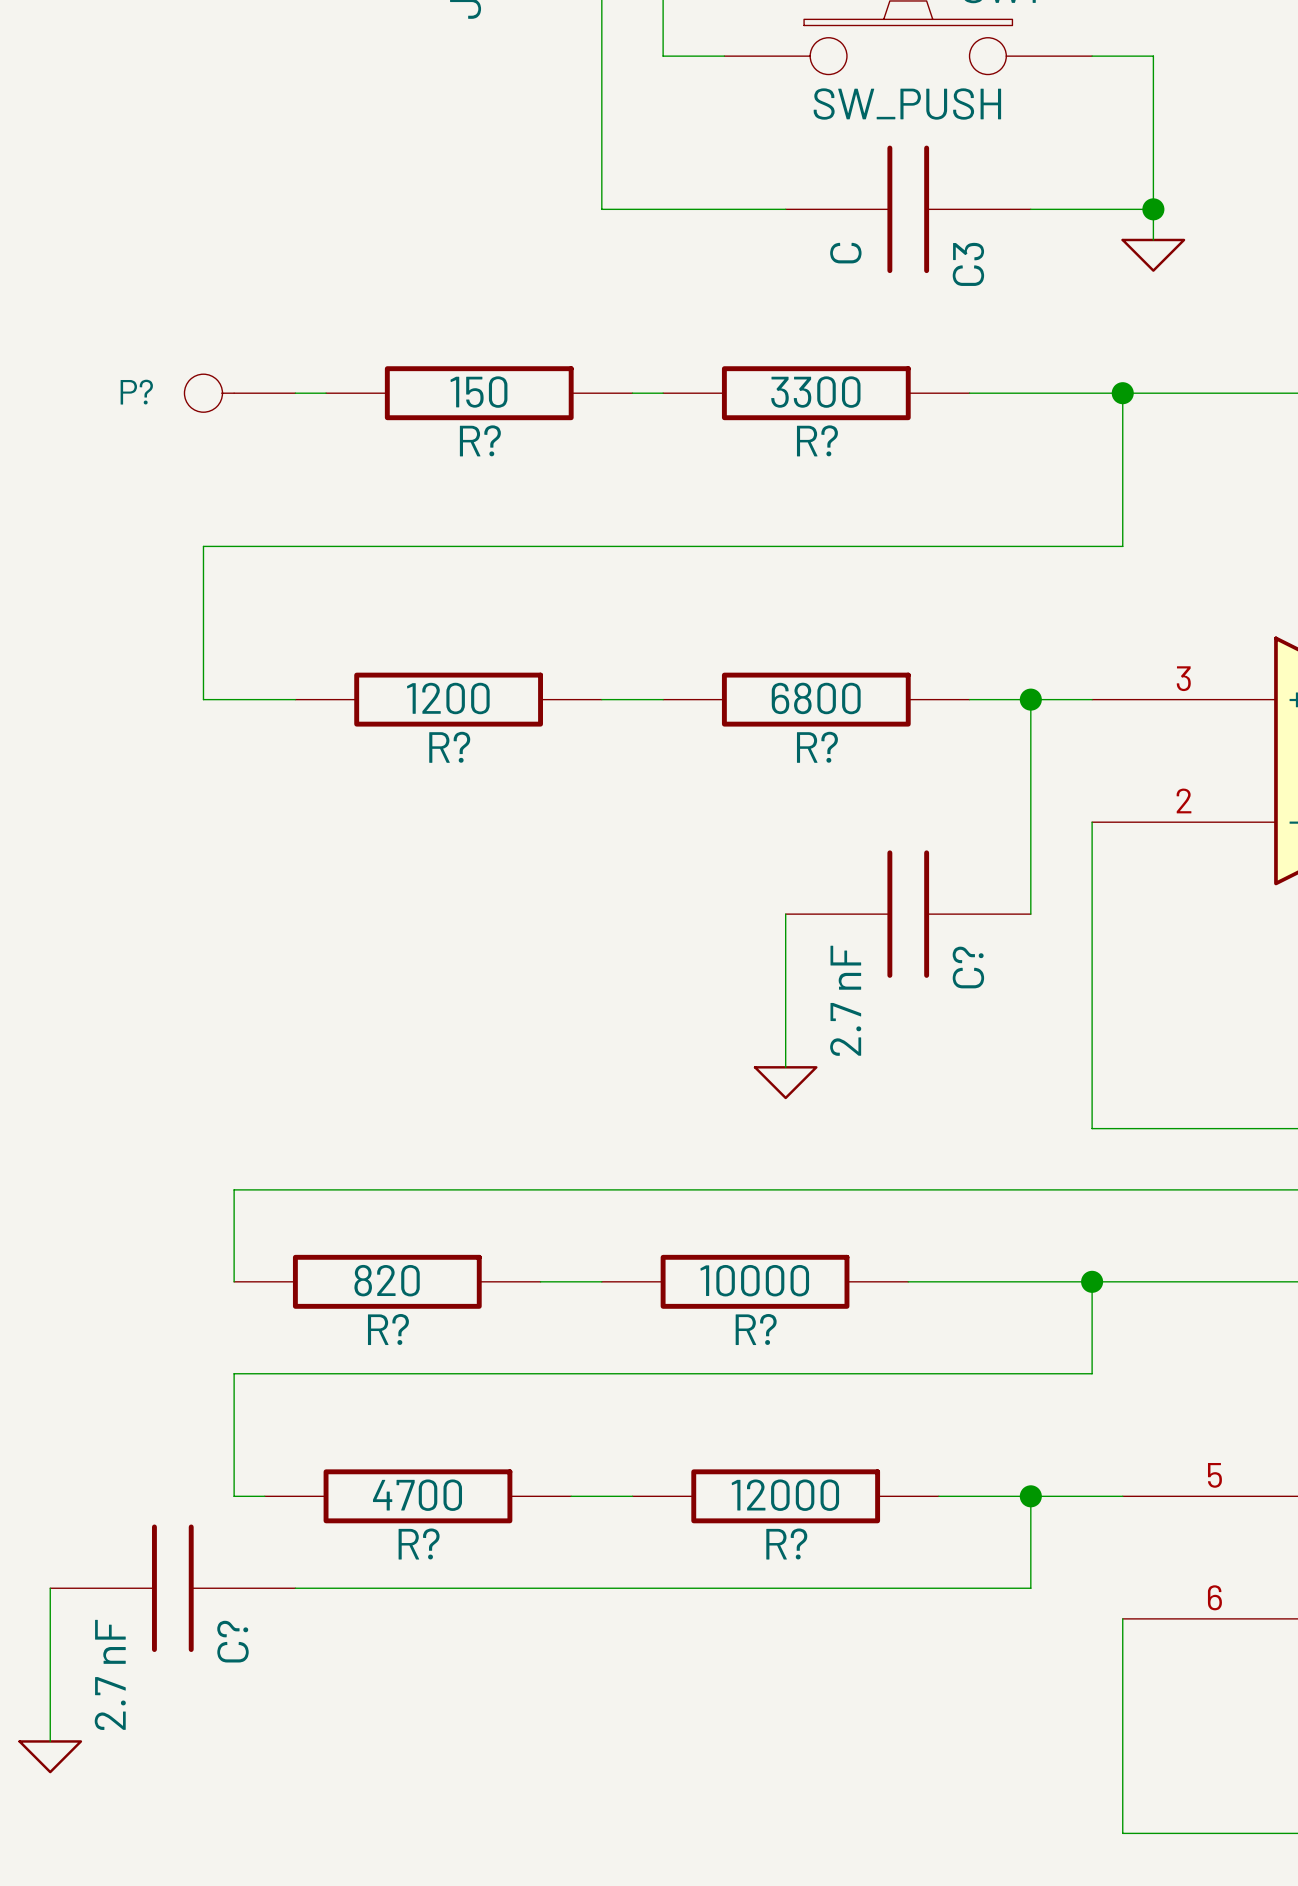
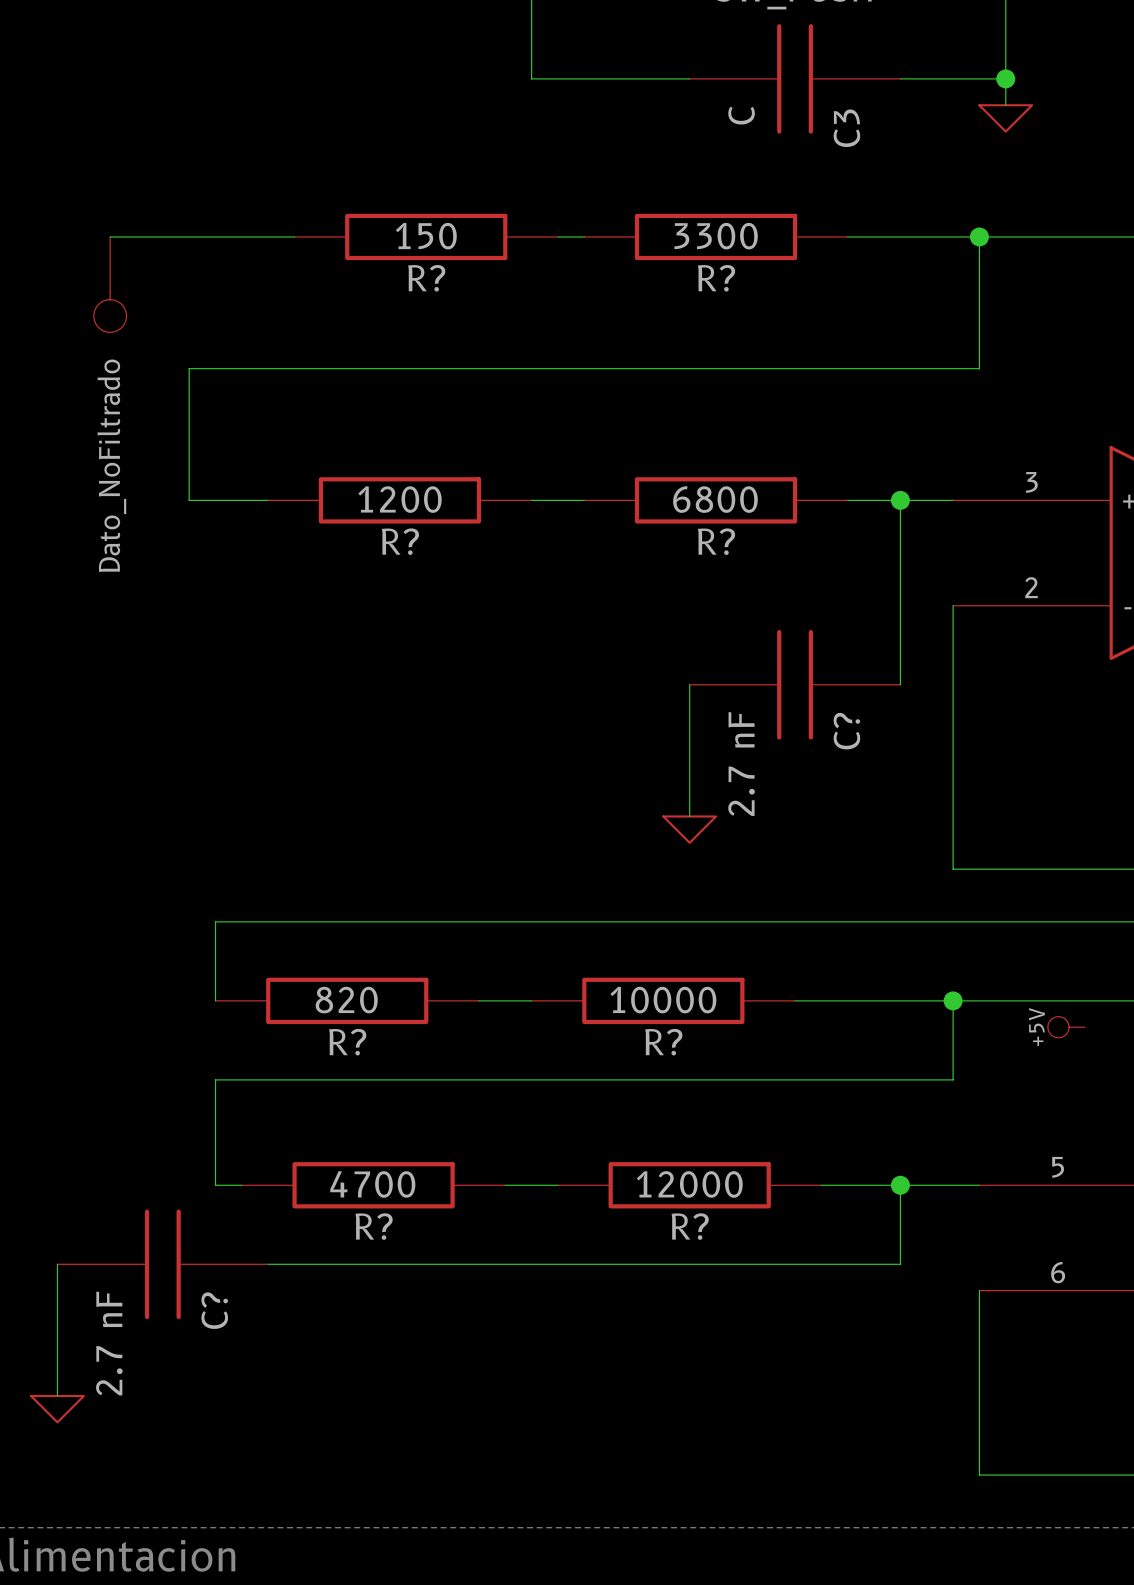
wire: none -> (110, 236) (268, 236)
P?: (239, 393) -> none
Dato_NoFiltrado: none -> (110, 284)
power symbol: none -> +5V (1066, 1027)

